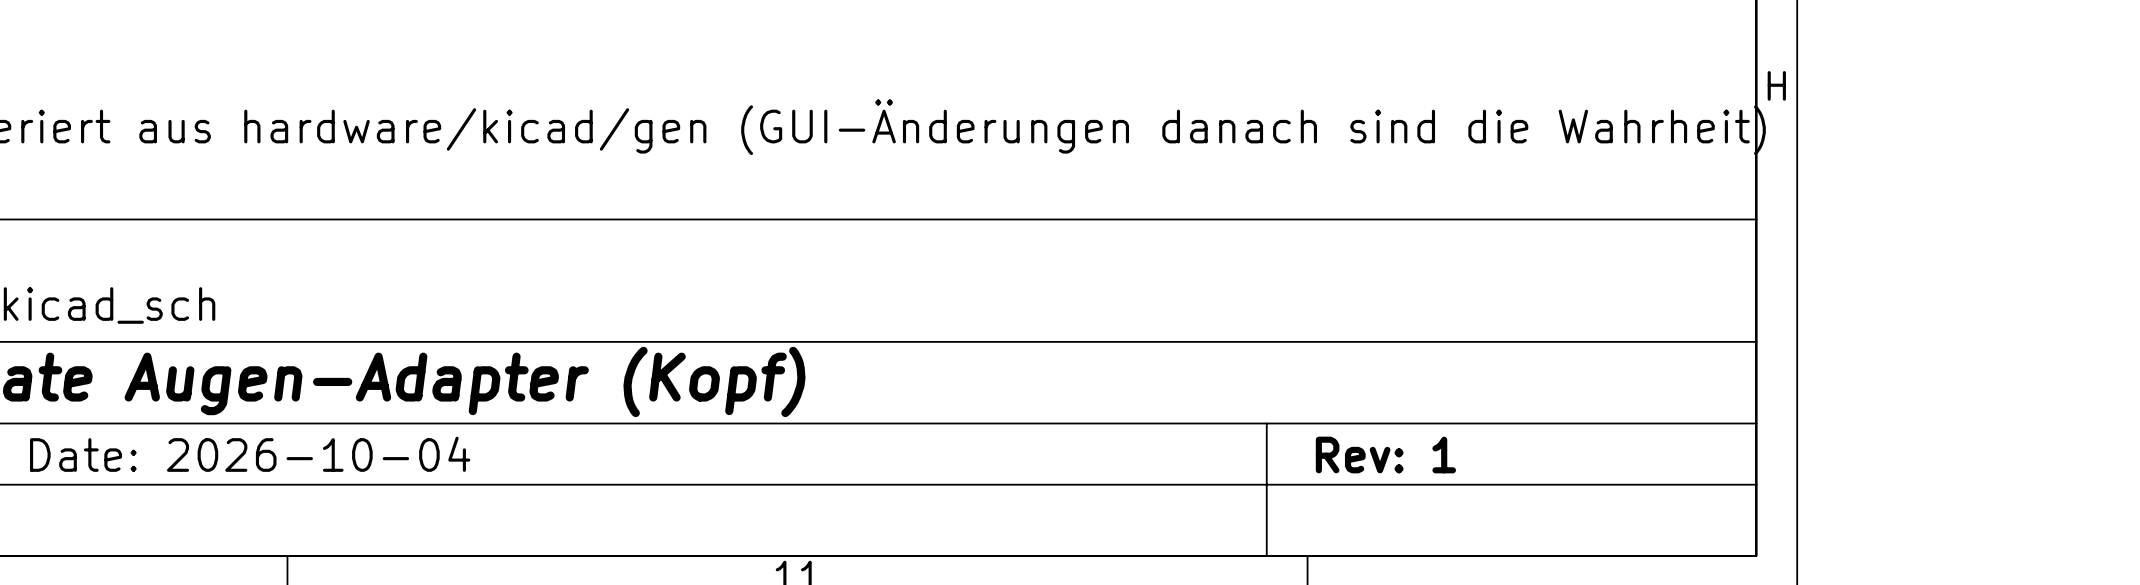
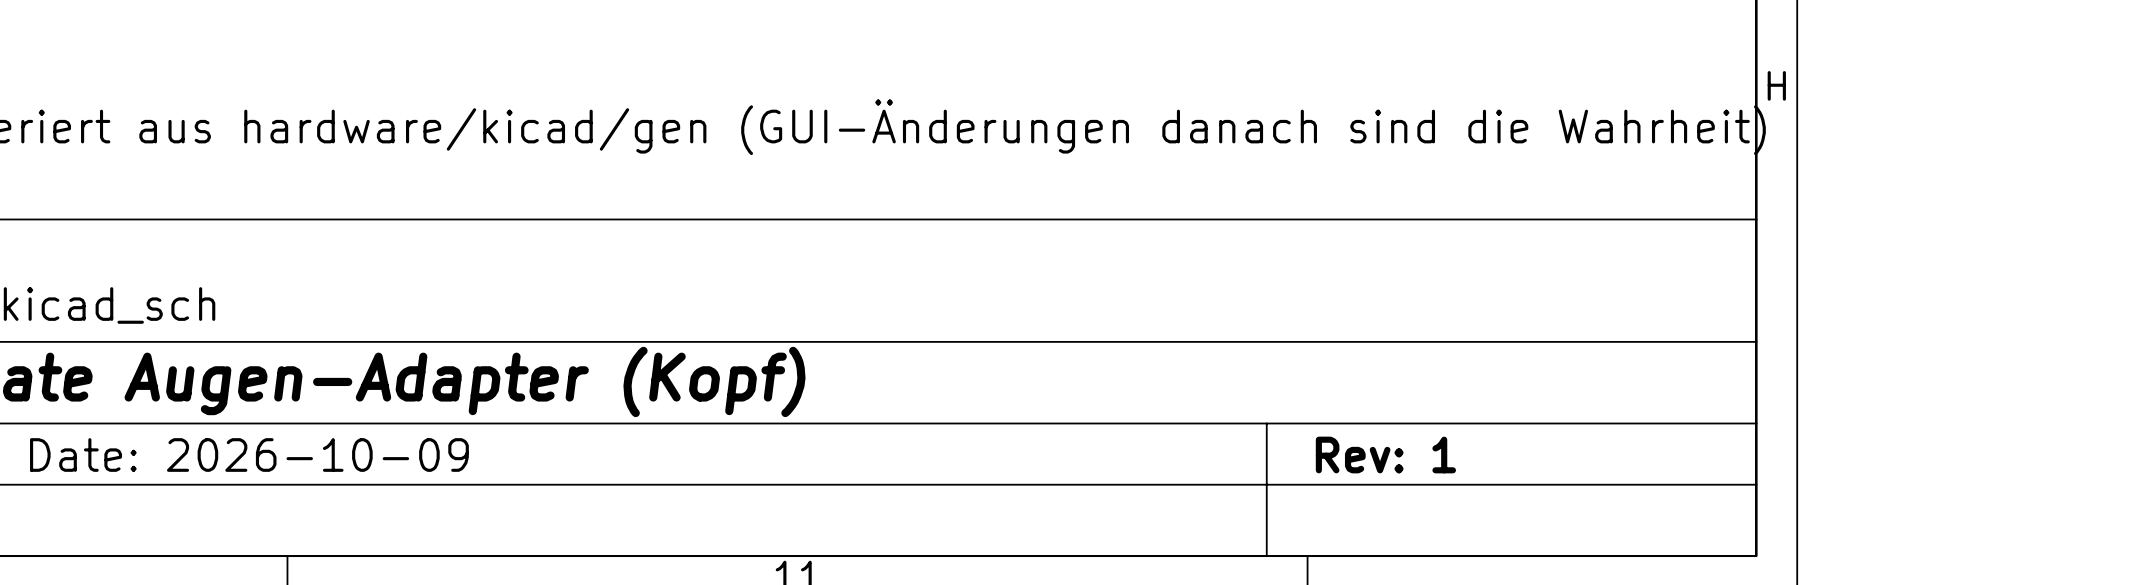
title block: Date: 2026-10-04 (250, 454) -> Date: 2026-10-09 (249, 455)

